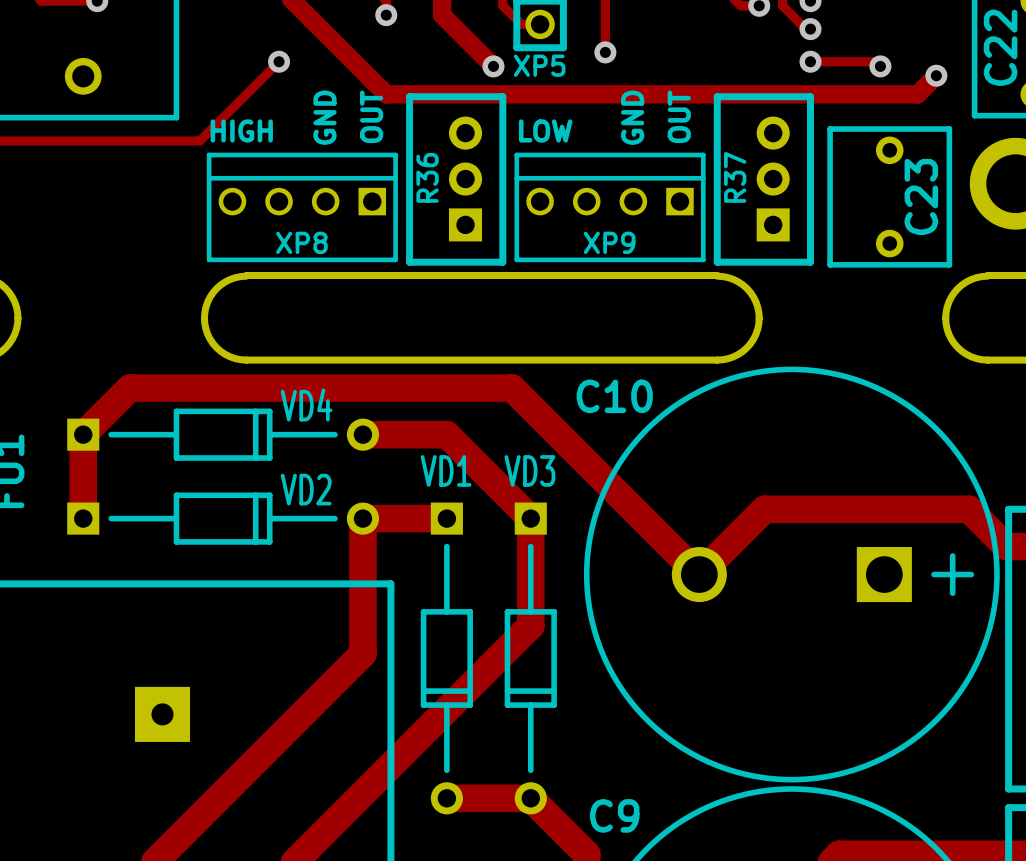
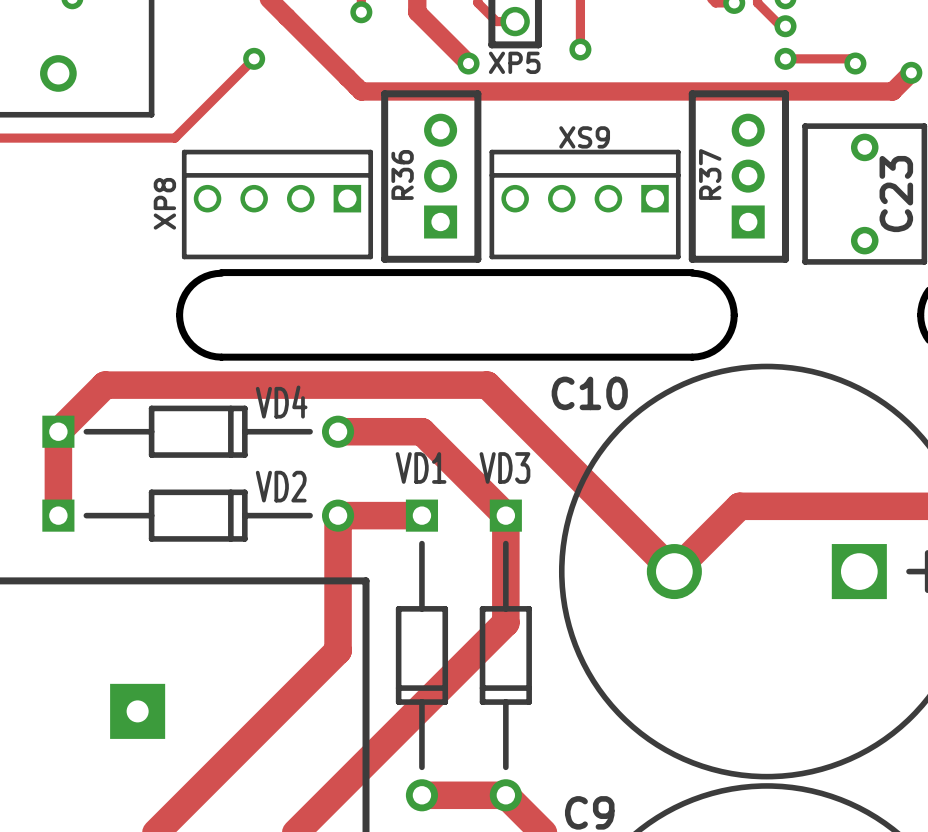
text: OUT (371, 116) -> none
text: OUT (679, 116) -> none
text: GND (324, 117) -> none
text: GND (632, 117) -> none
text: HIGH (241, 130) -> none
text: LOW (545, 130) -> none
XP8 name rotation: 0° (301, 242) -> 90° counterclockwise (164, 203)
XP8 name position: XP8 (301, 242) -> XP8 (164, 203)
XP9 name: XP9 (609, 242) -> XS9 (584, 137)

